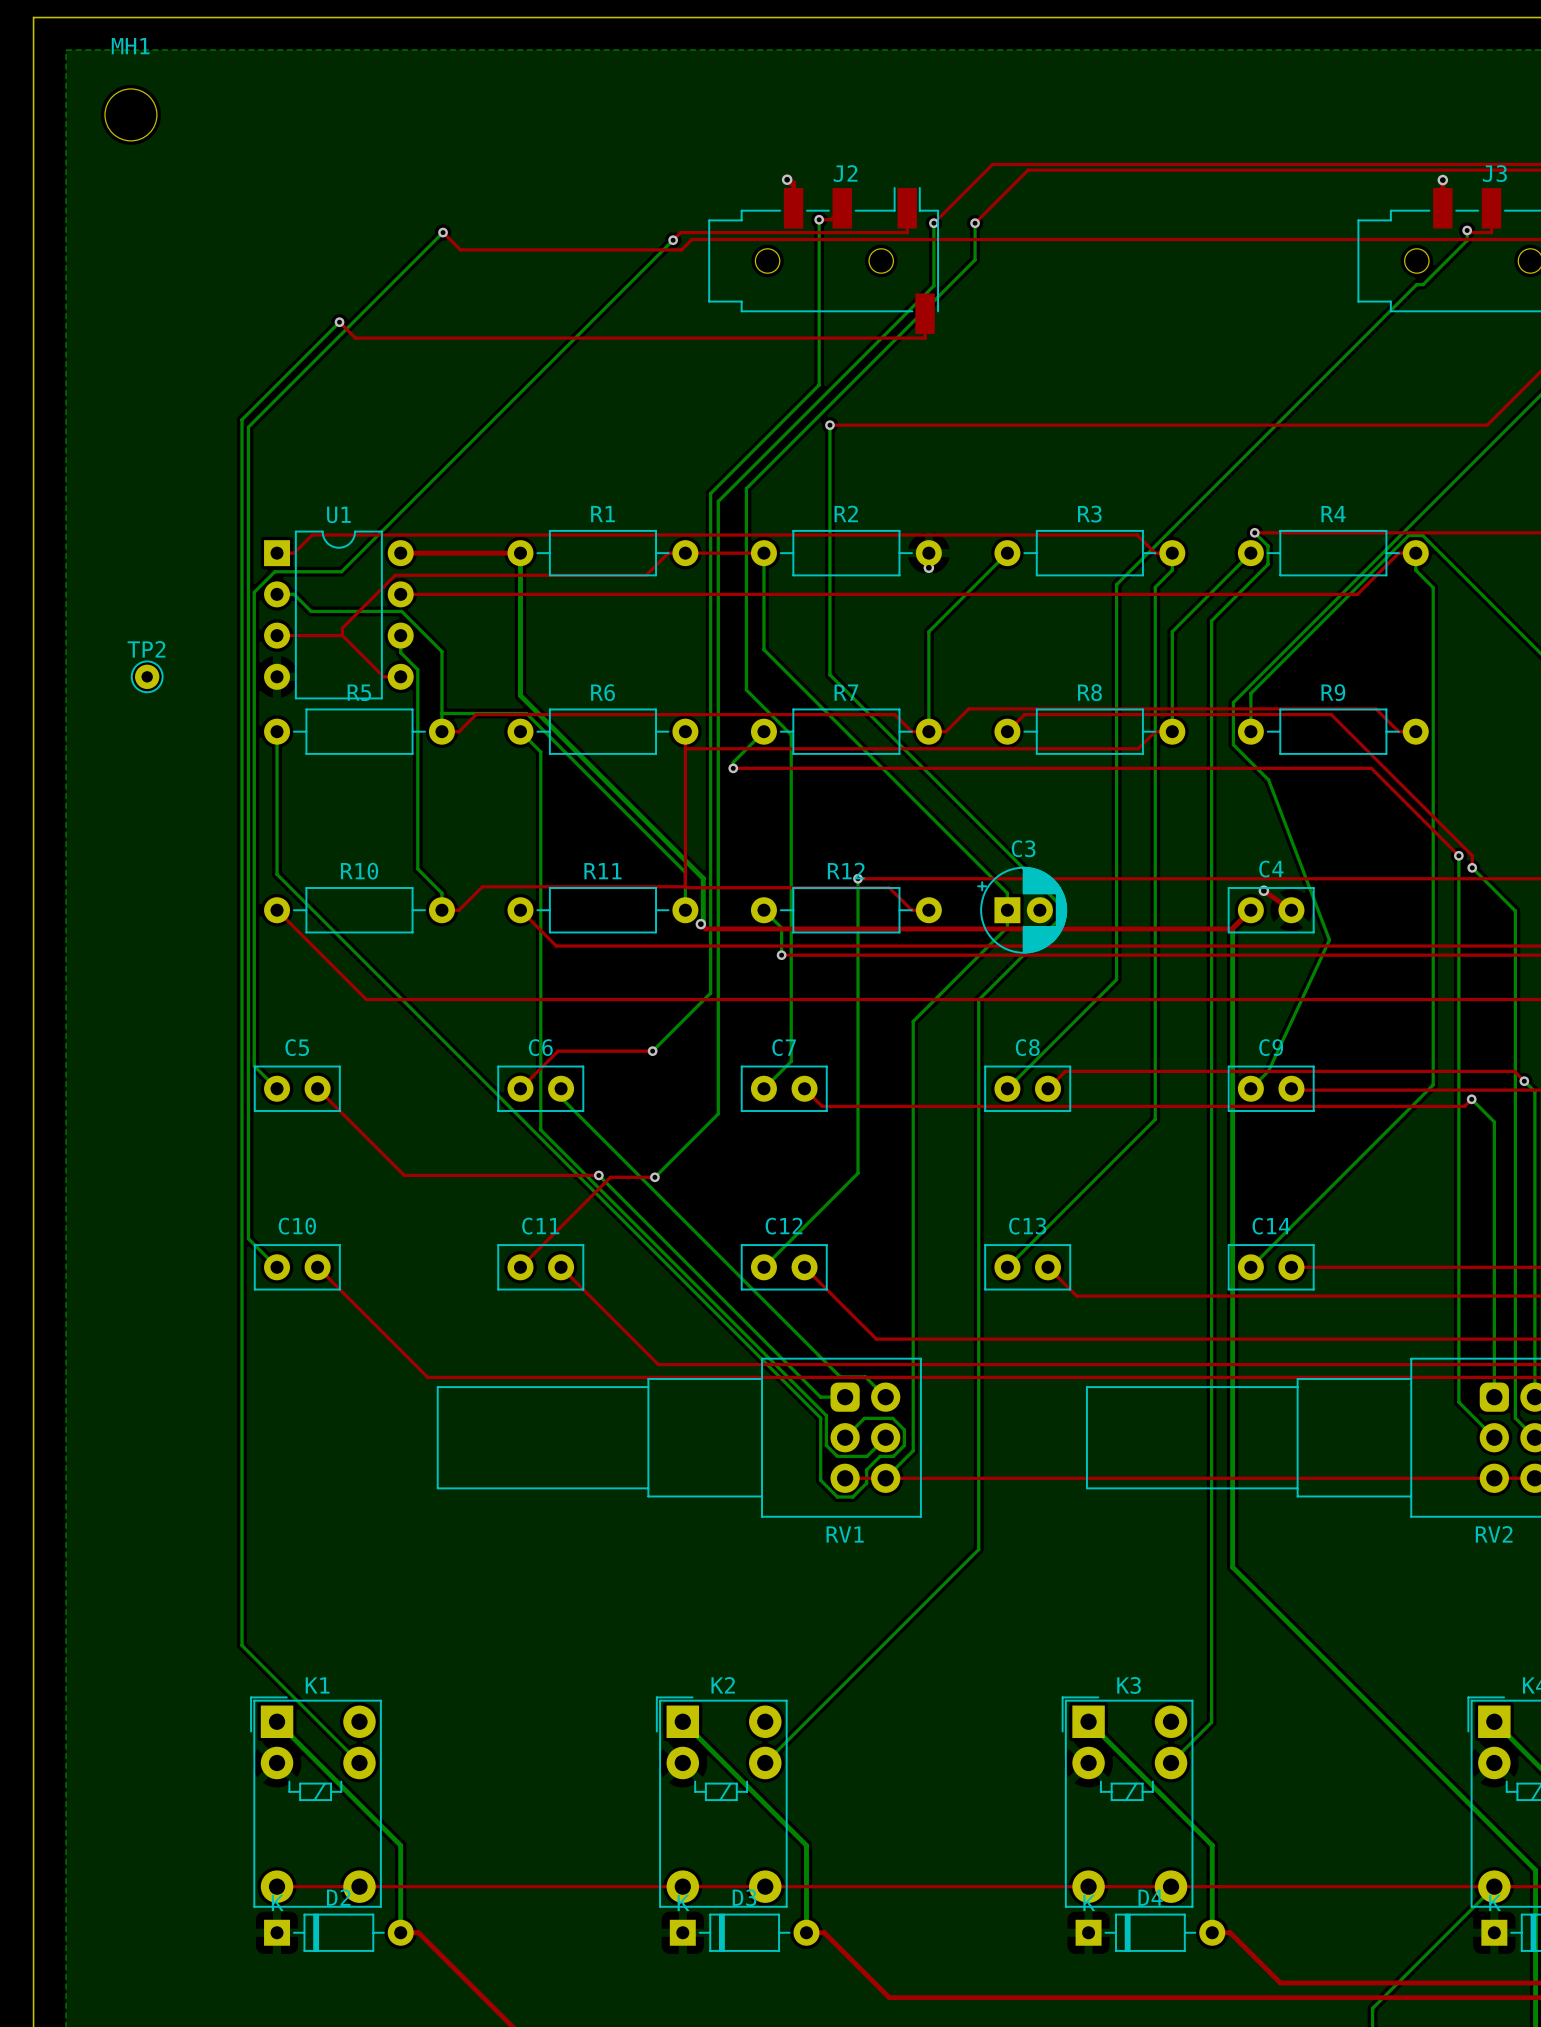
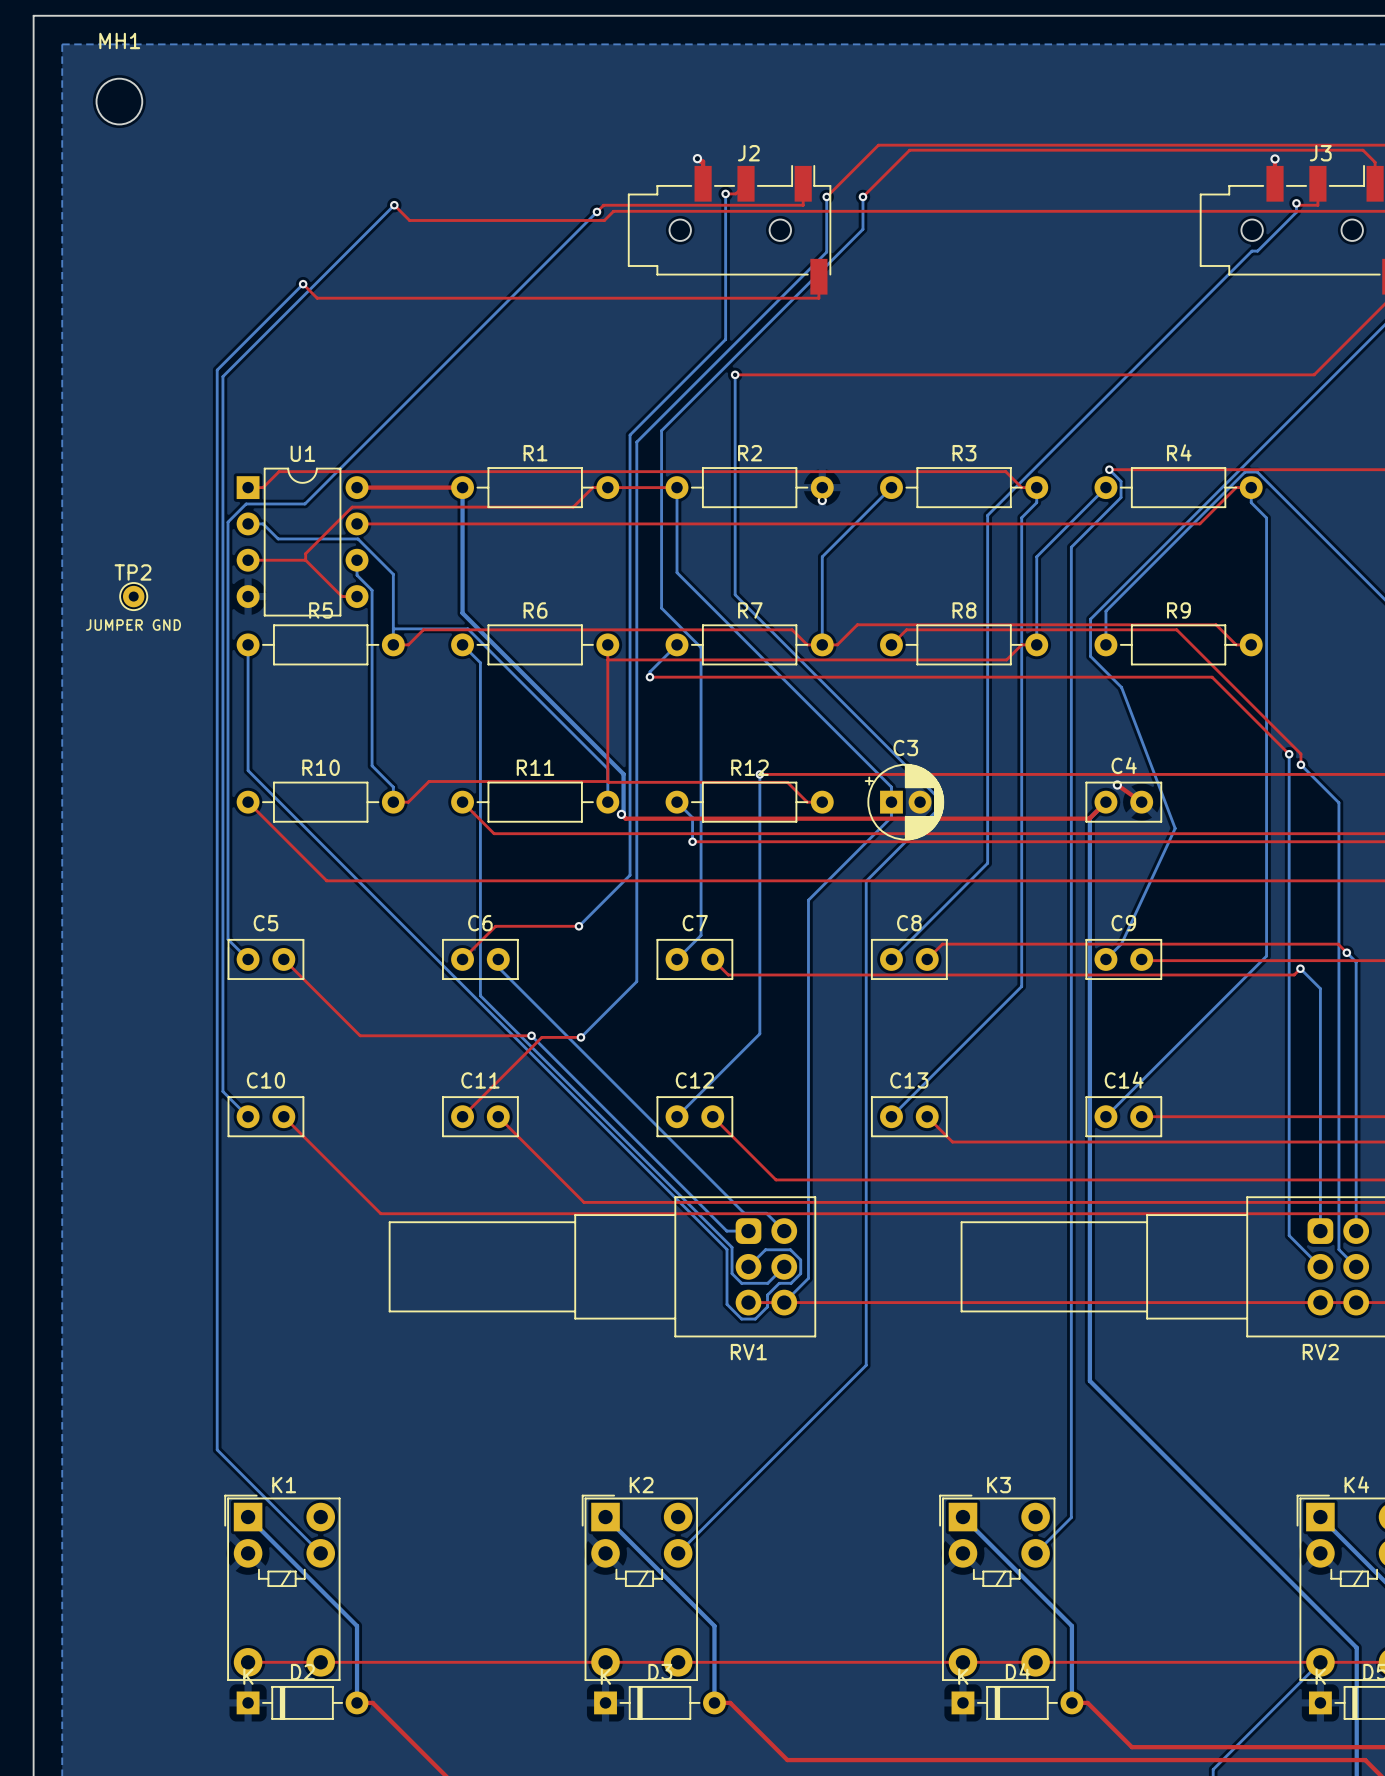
text: none -> JUMPER GND (133, 625)

